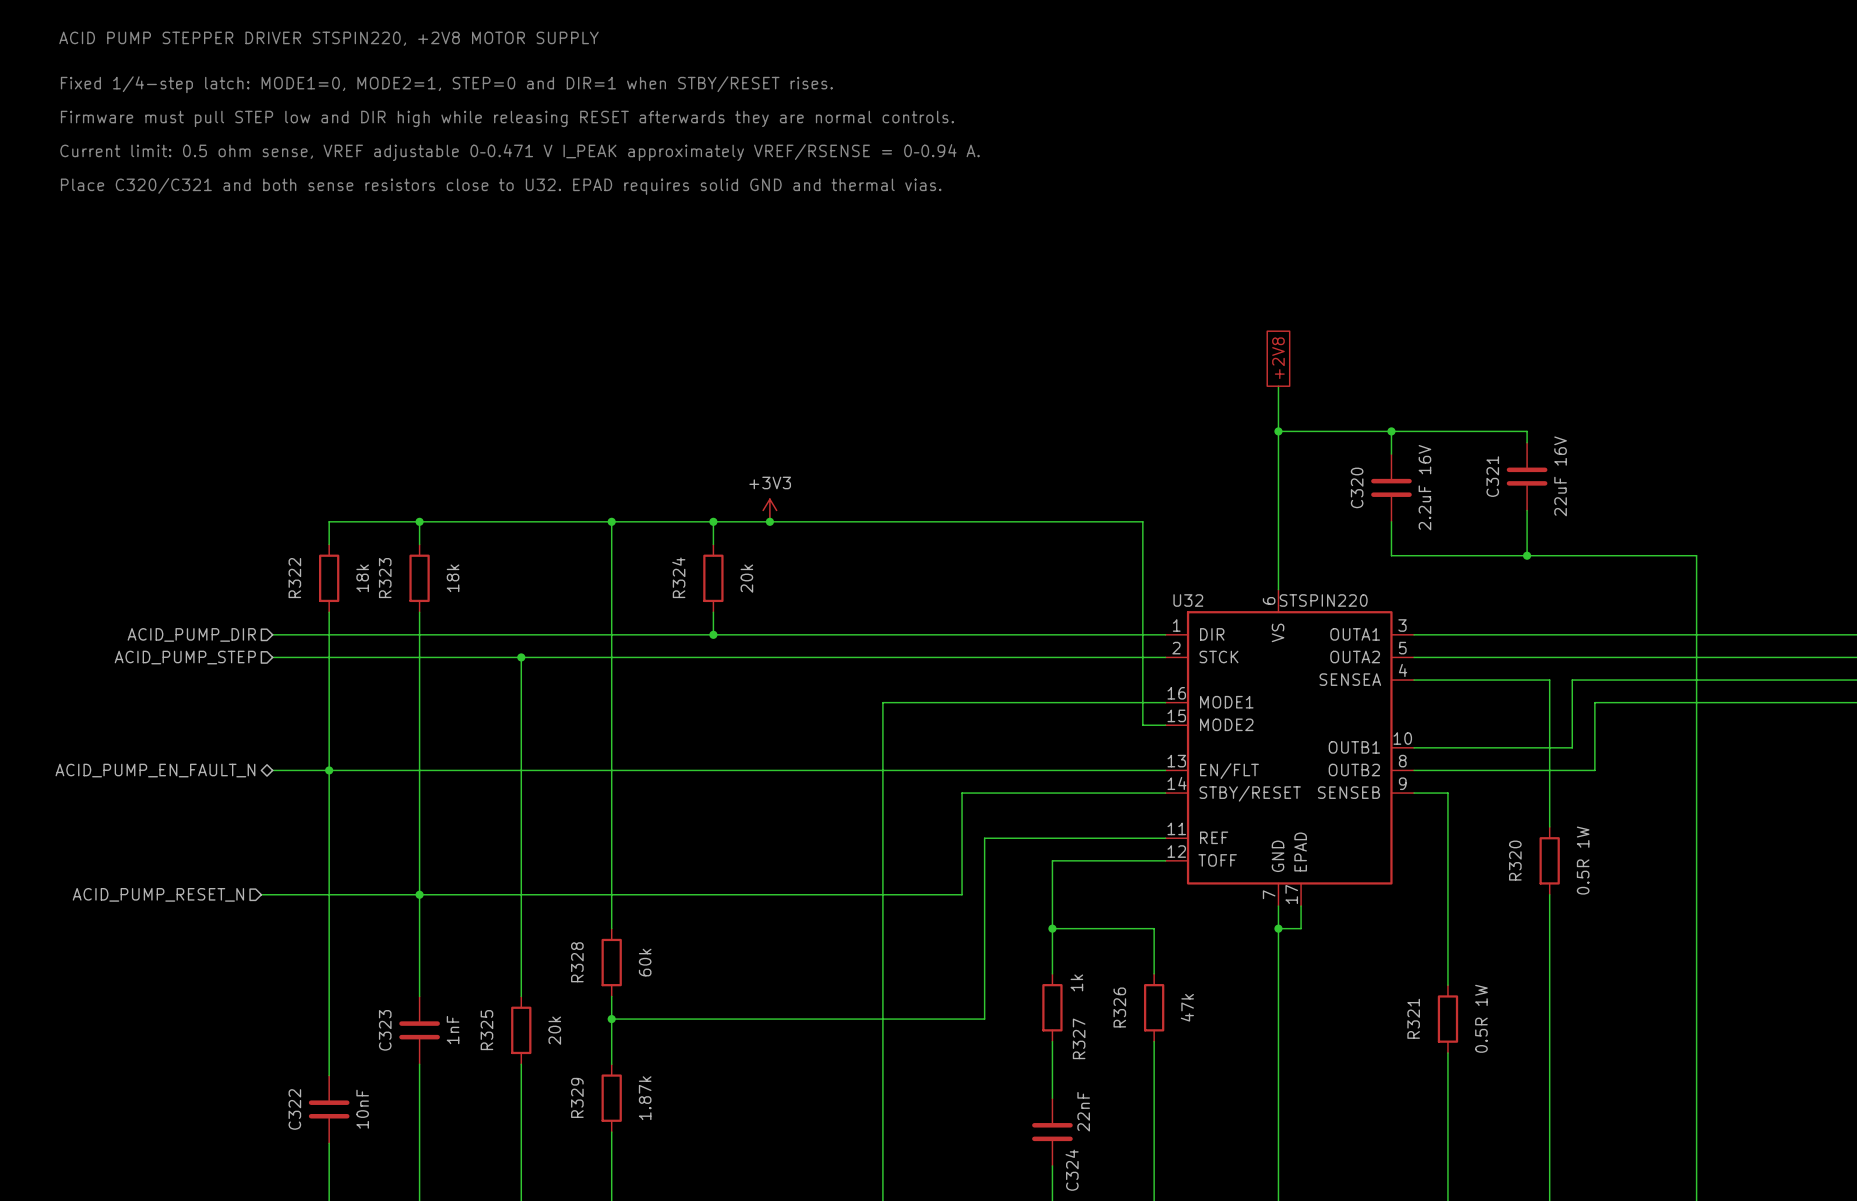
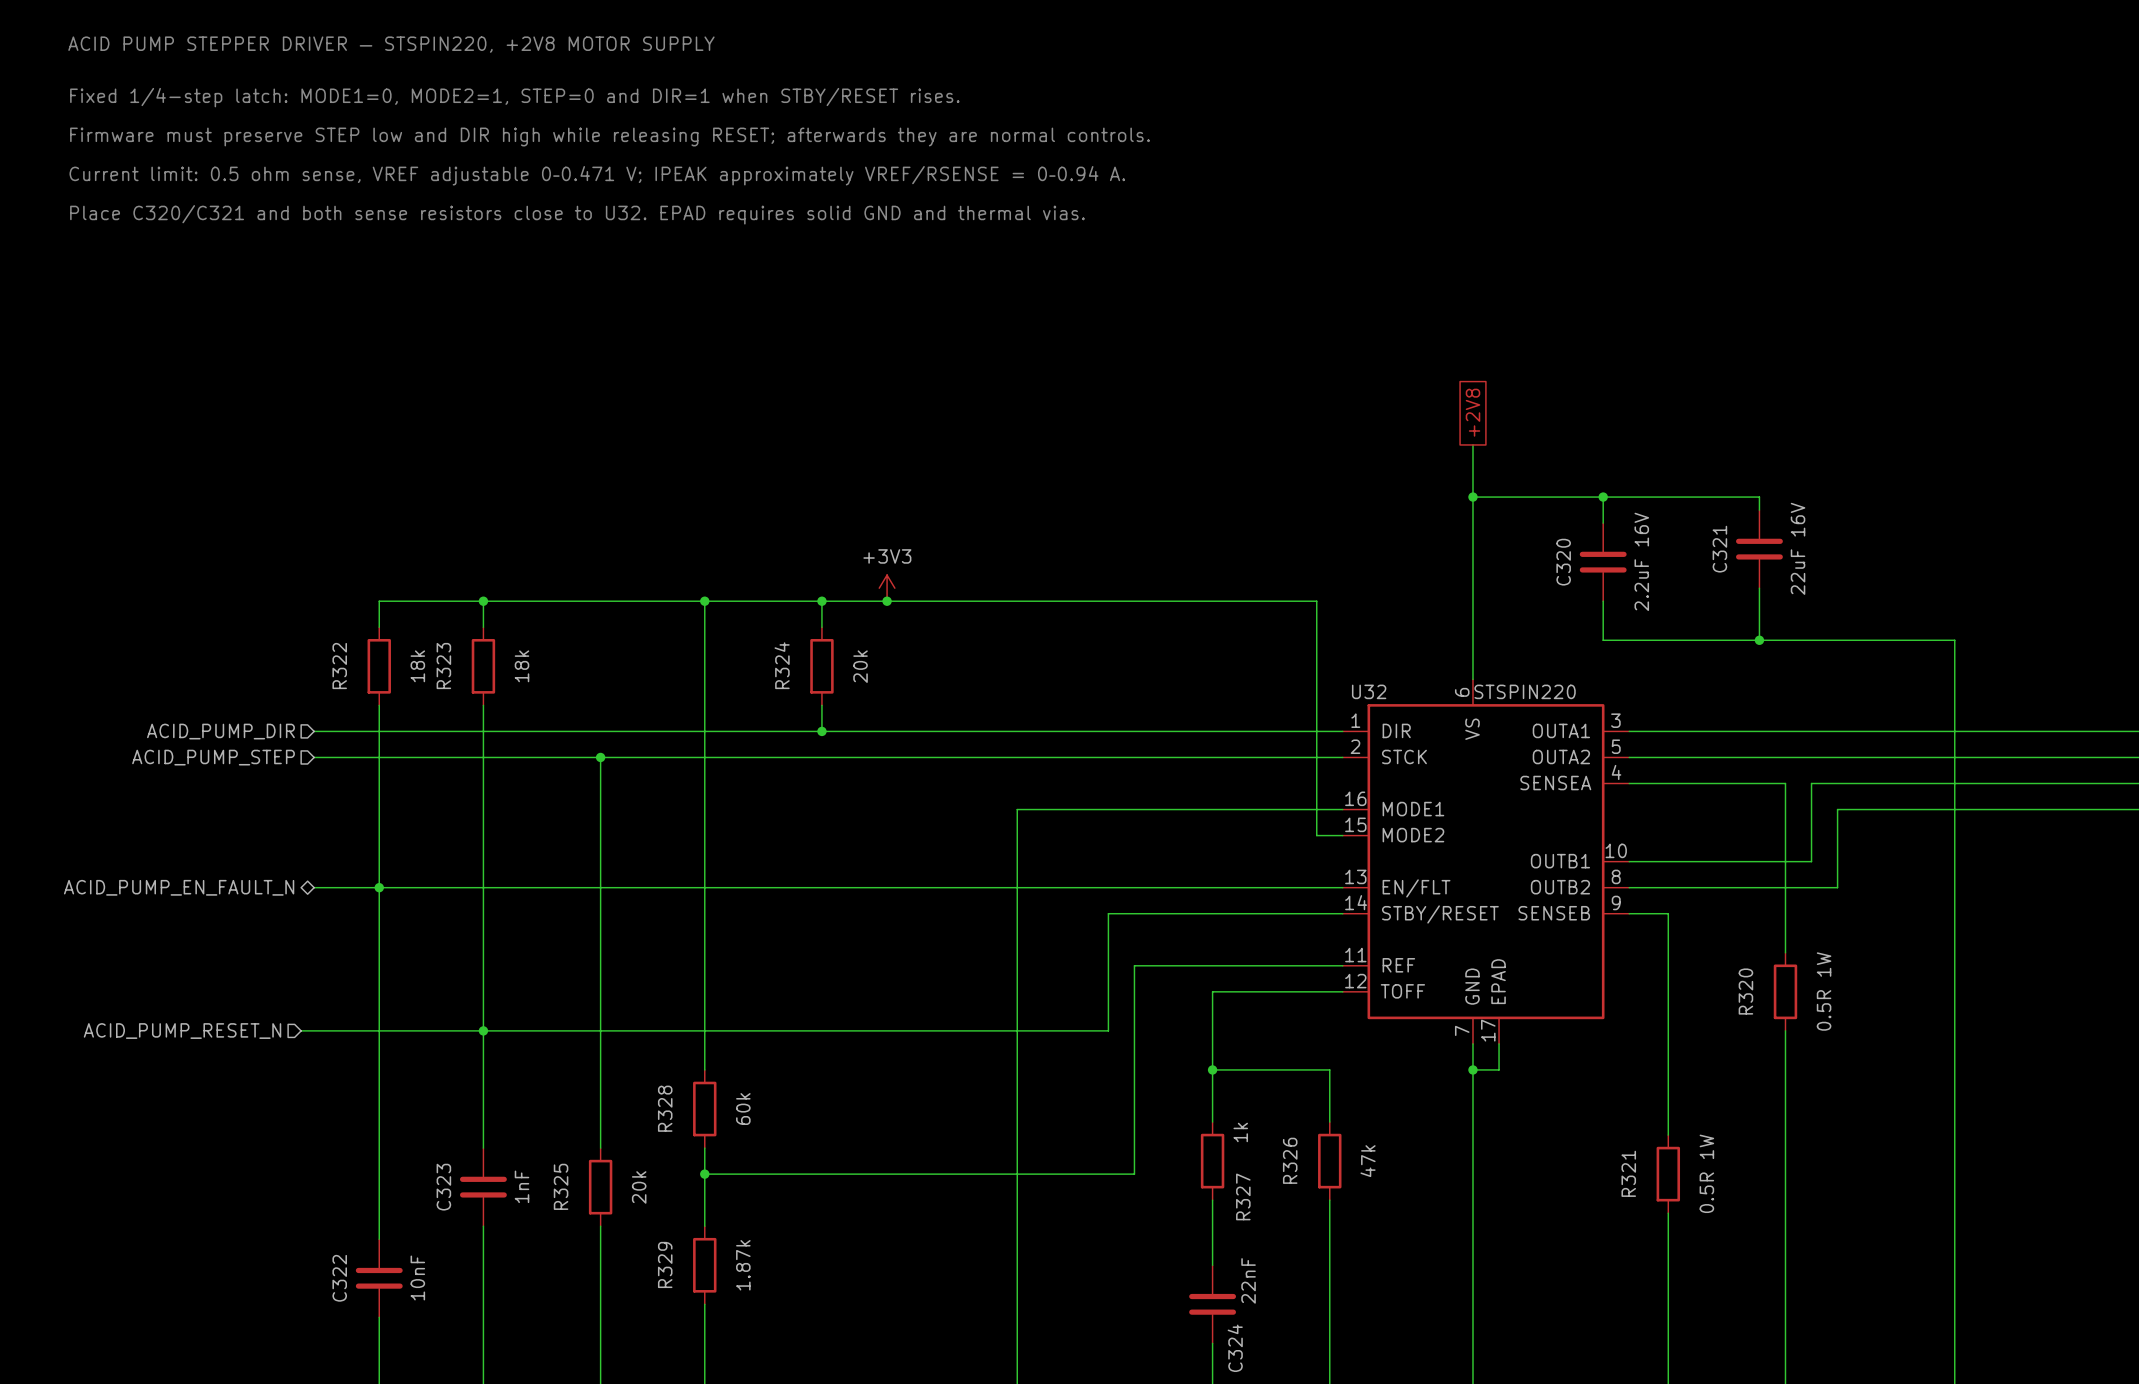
text: ACID PUMP STEPPER DRIVER STSPIN220, +2V8 MOTOR SUPPLY (328, 38) -> ACID PUMP STEPPER DRIVER — STSPIN220, +2V8 MOTOR SUPPLY (391, 44)
text: Firmware must pull STEP low and DIR high while releasing RESET afterwards they are normal controls. (507, 118) -> Firmware must preserve STEP low and DIR high while releasing RESET; afterwards they are normal controls. (610, 137)
text: Current limit: 0.5 ohm sense, VREF adjustable 0–0.471 V I_PEAK approximately VREF/RSENSE = 0–0.94 A. (520, 152) -> Current limit: 0.5 ohm sense, VREF adjustable 0–0.471 V; IPEAK approximately VREF/RSENSE = 0–0.94 A. (597, 175)

